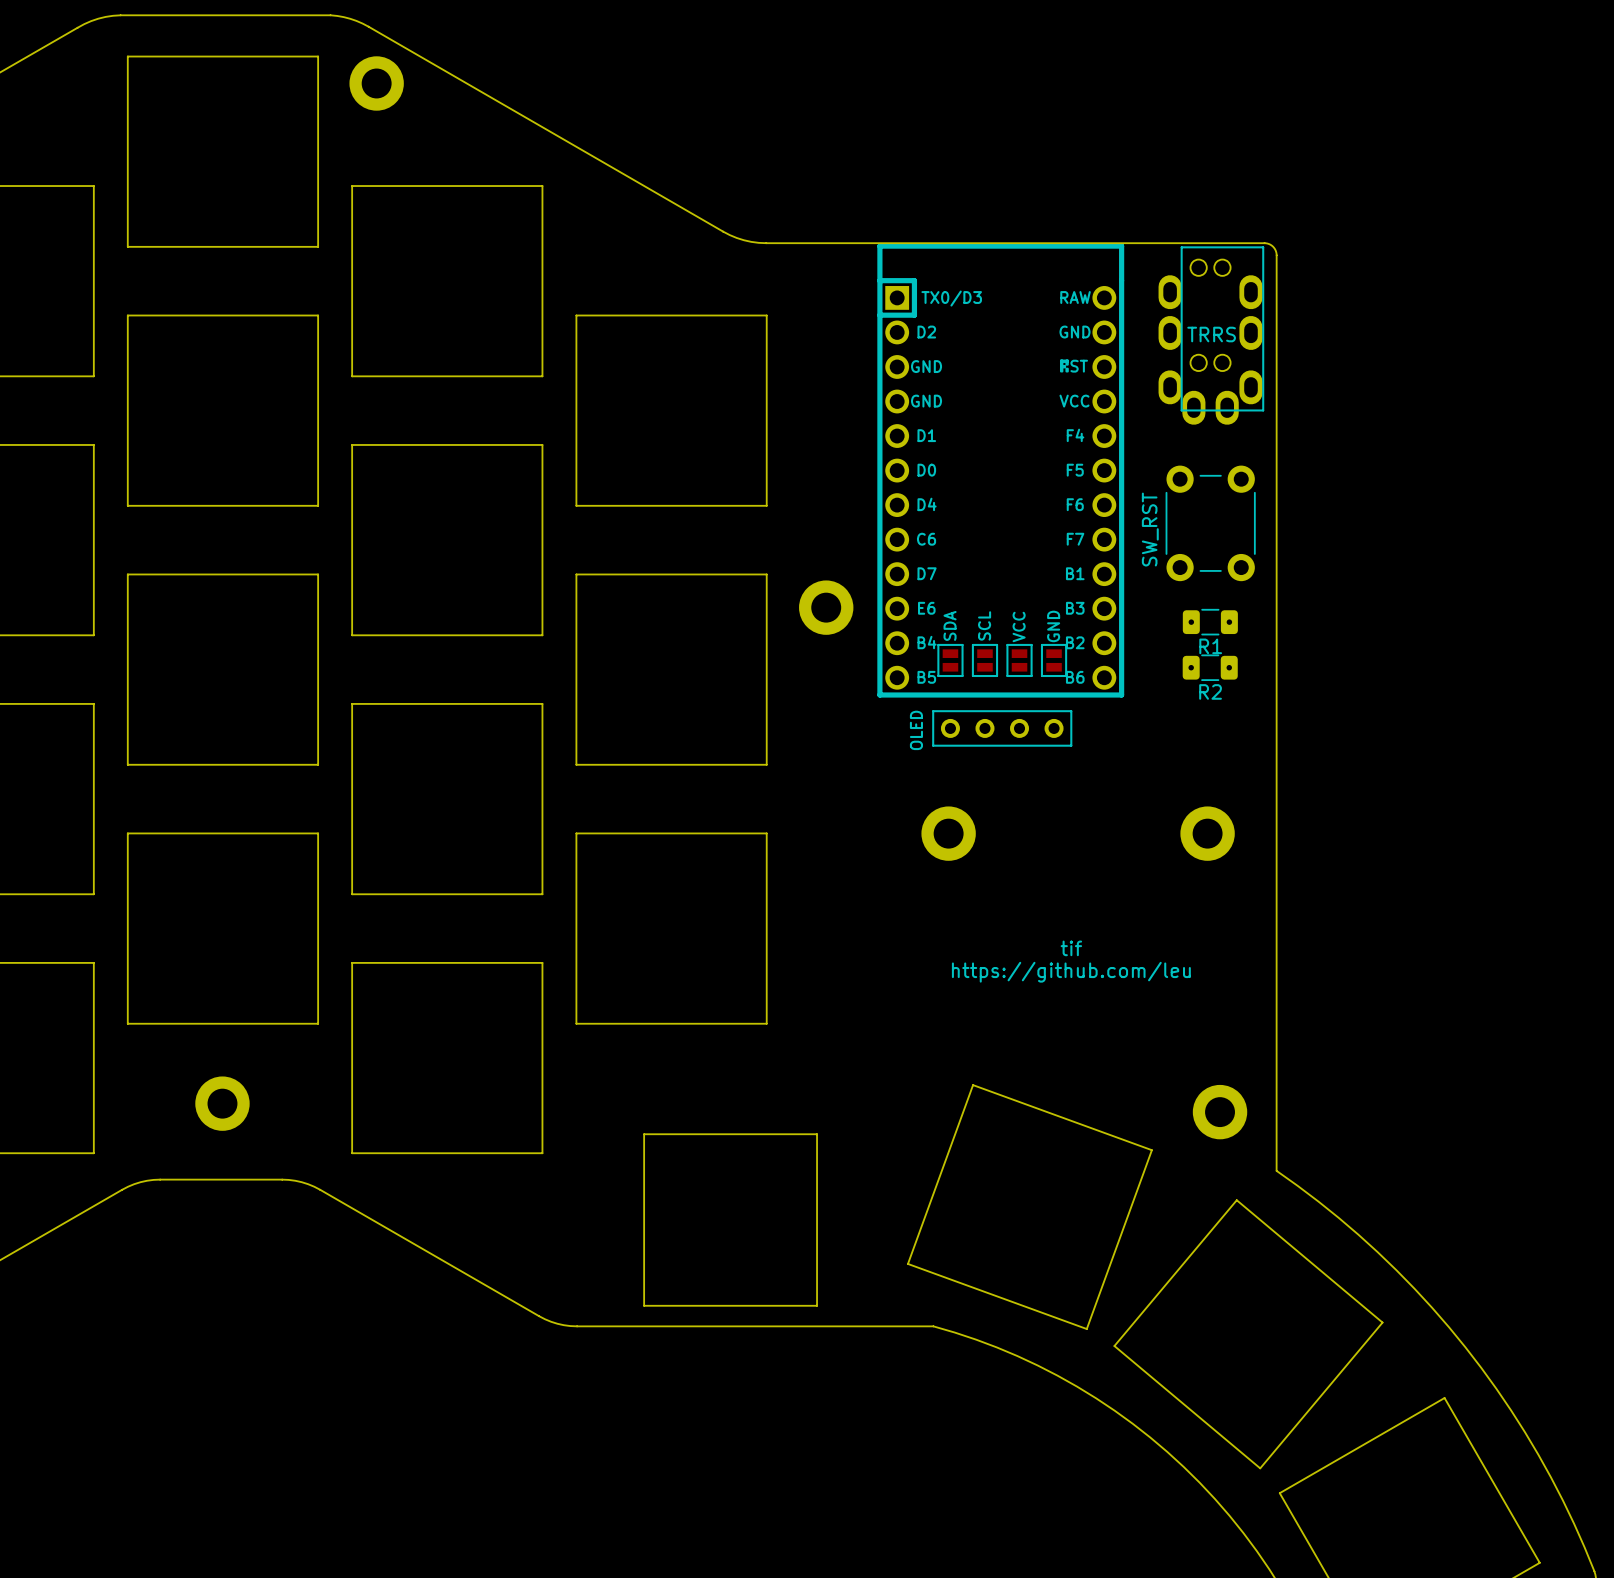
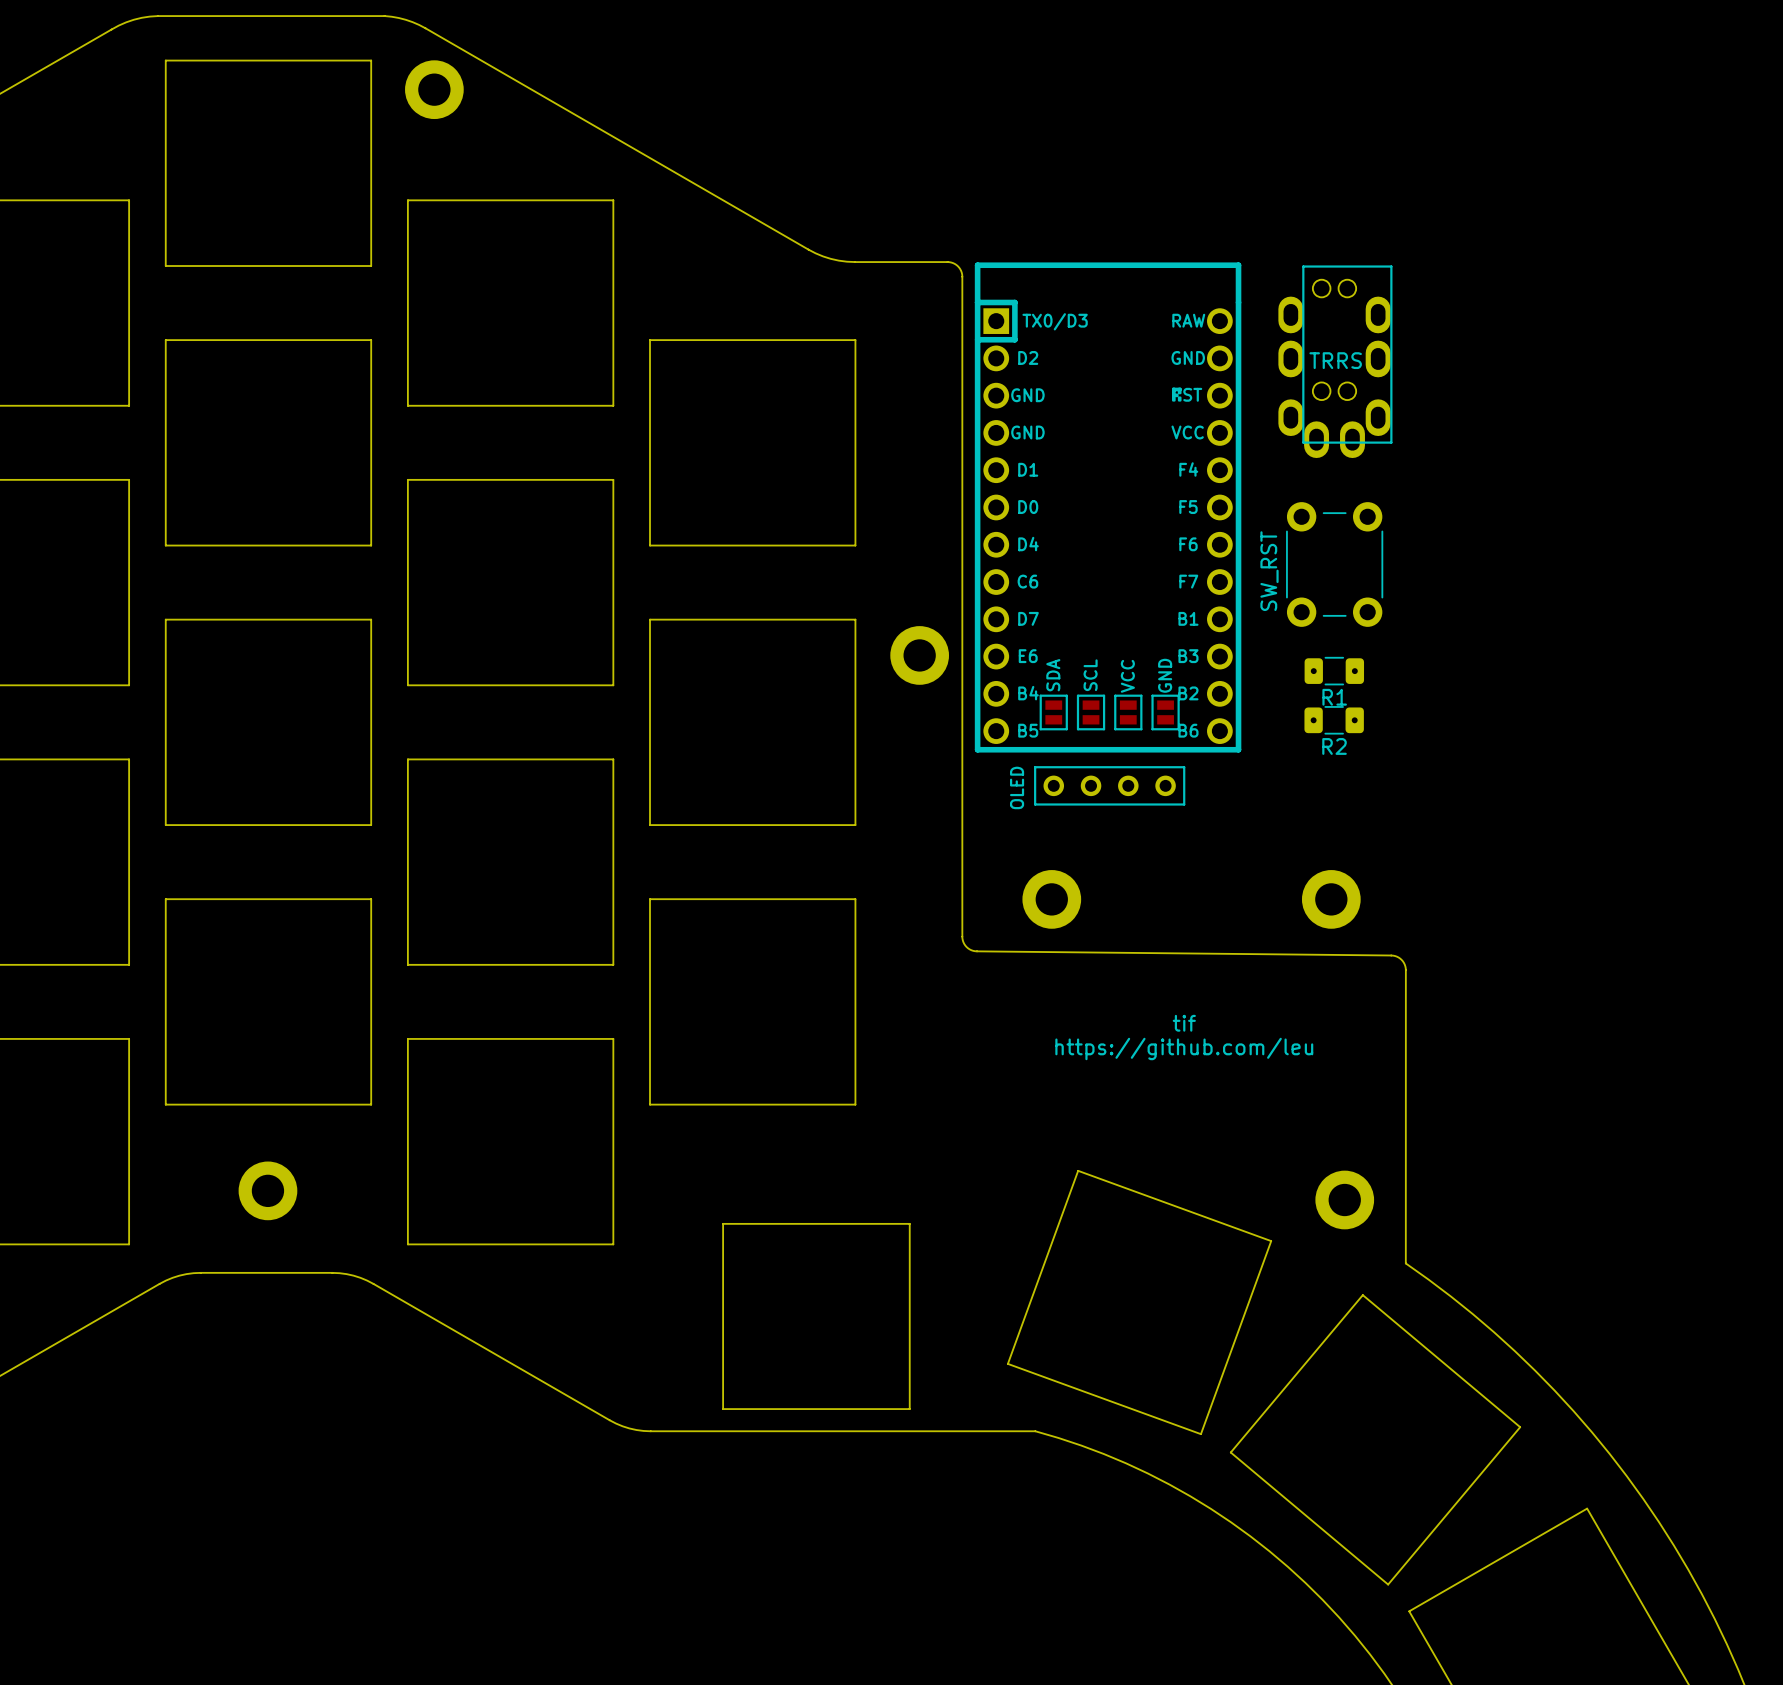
board edge: (766, 243) (1264, 243) (1270, 244) (1275, 249) (1276, 255) (1276, 1170) -> (854, 262) (949, 262) (958, 266) (962, 274) (962, 936) (964, 944) (969, 949) (977, 951) (1391, 955) (1400, 958) (1405, 970) (1405, 1263)

